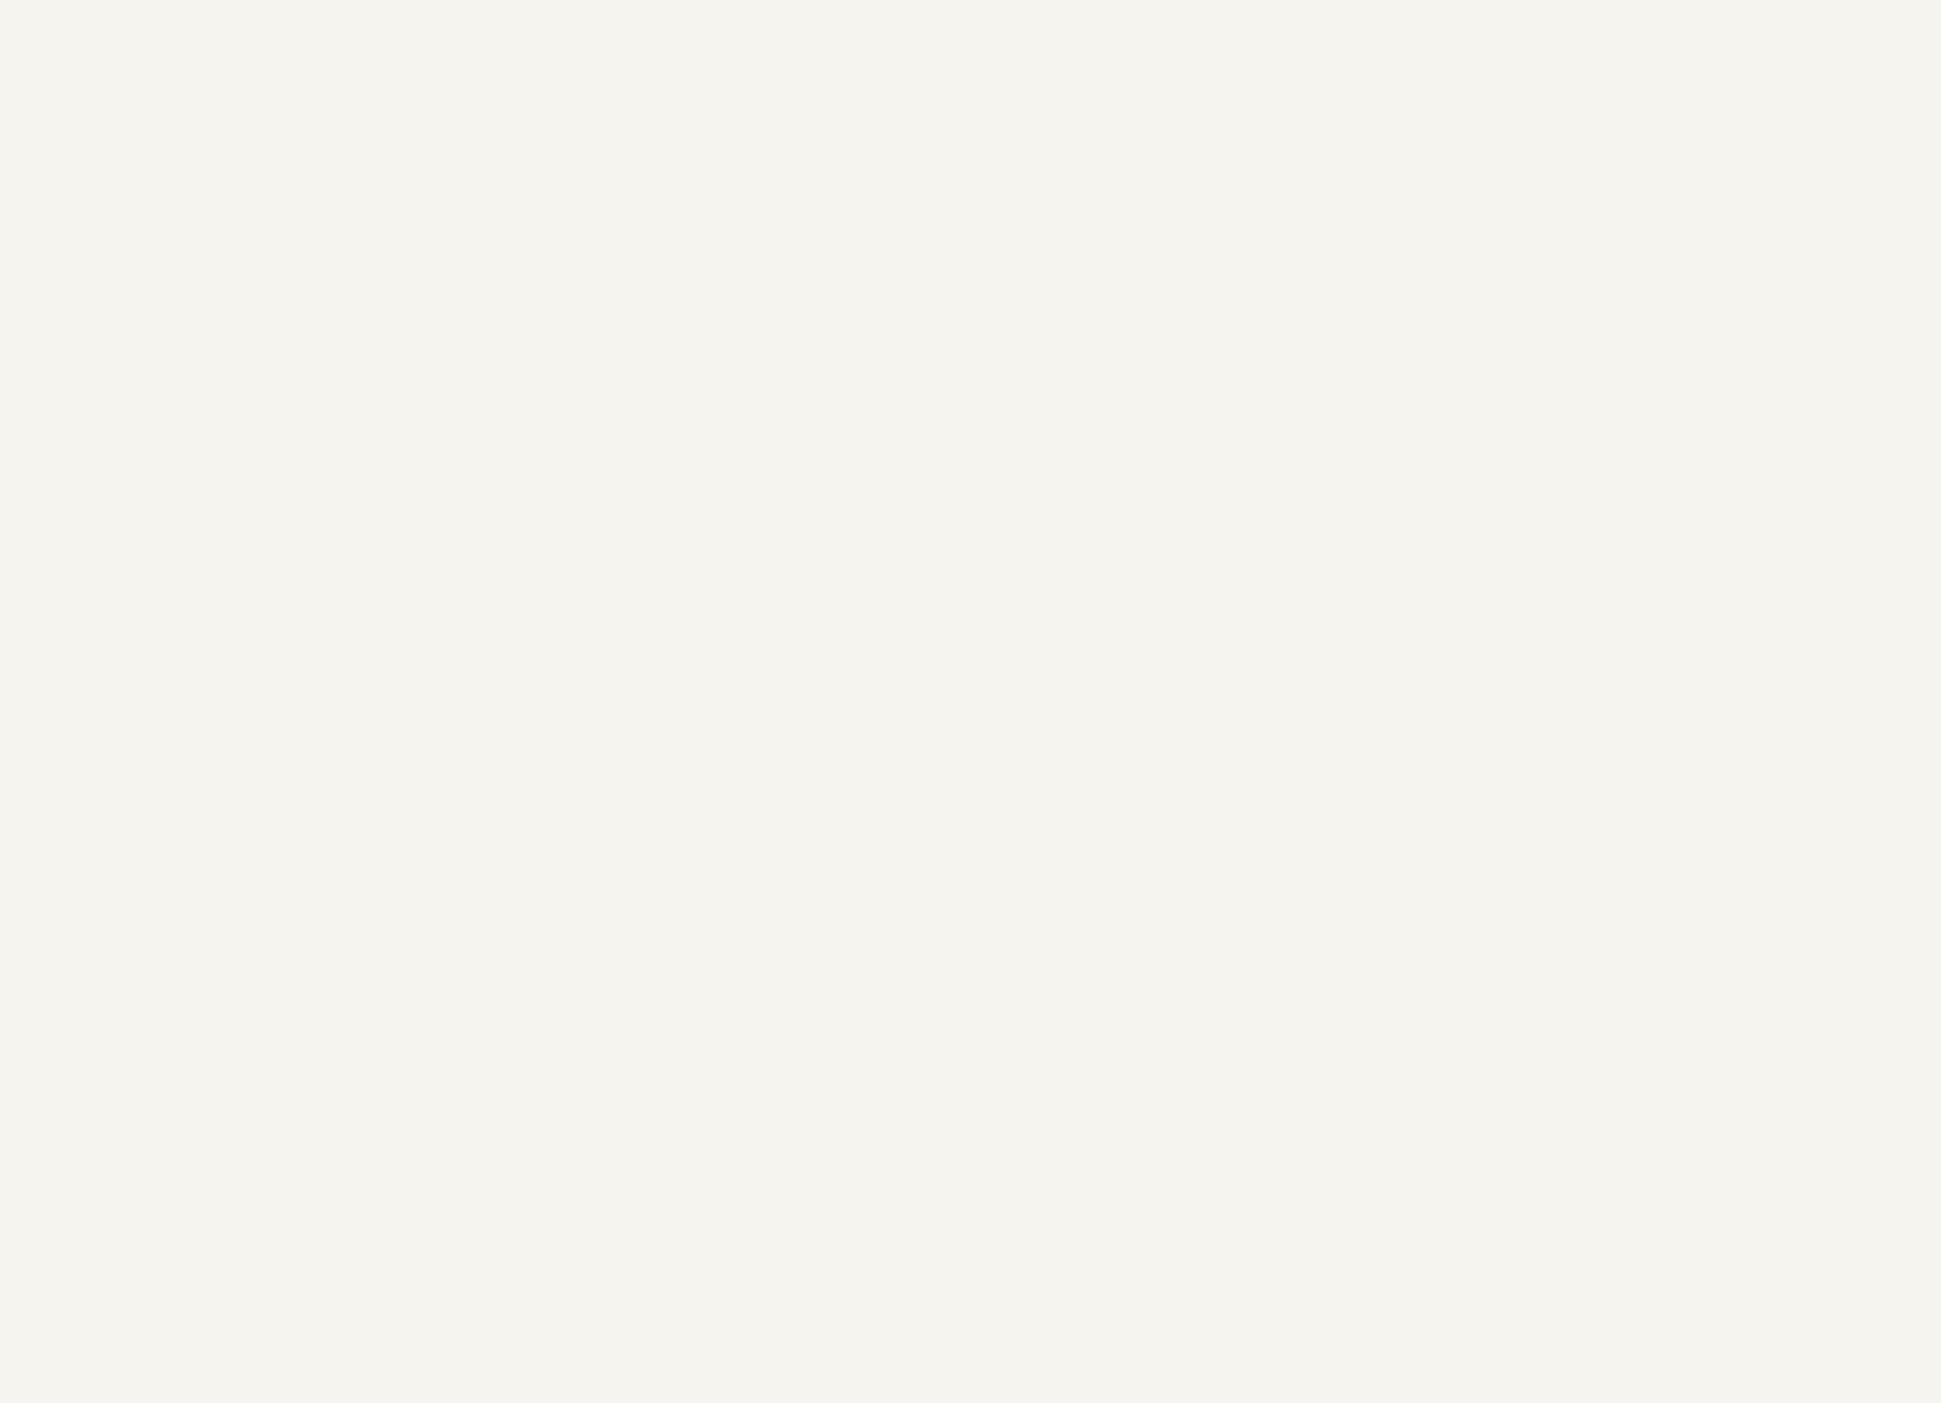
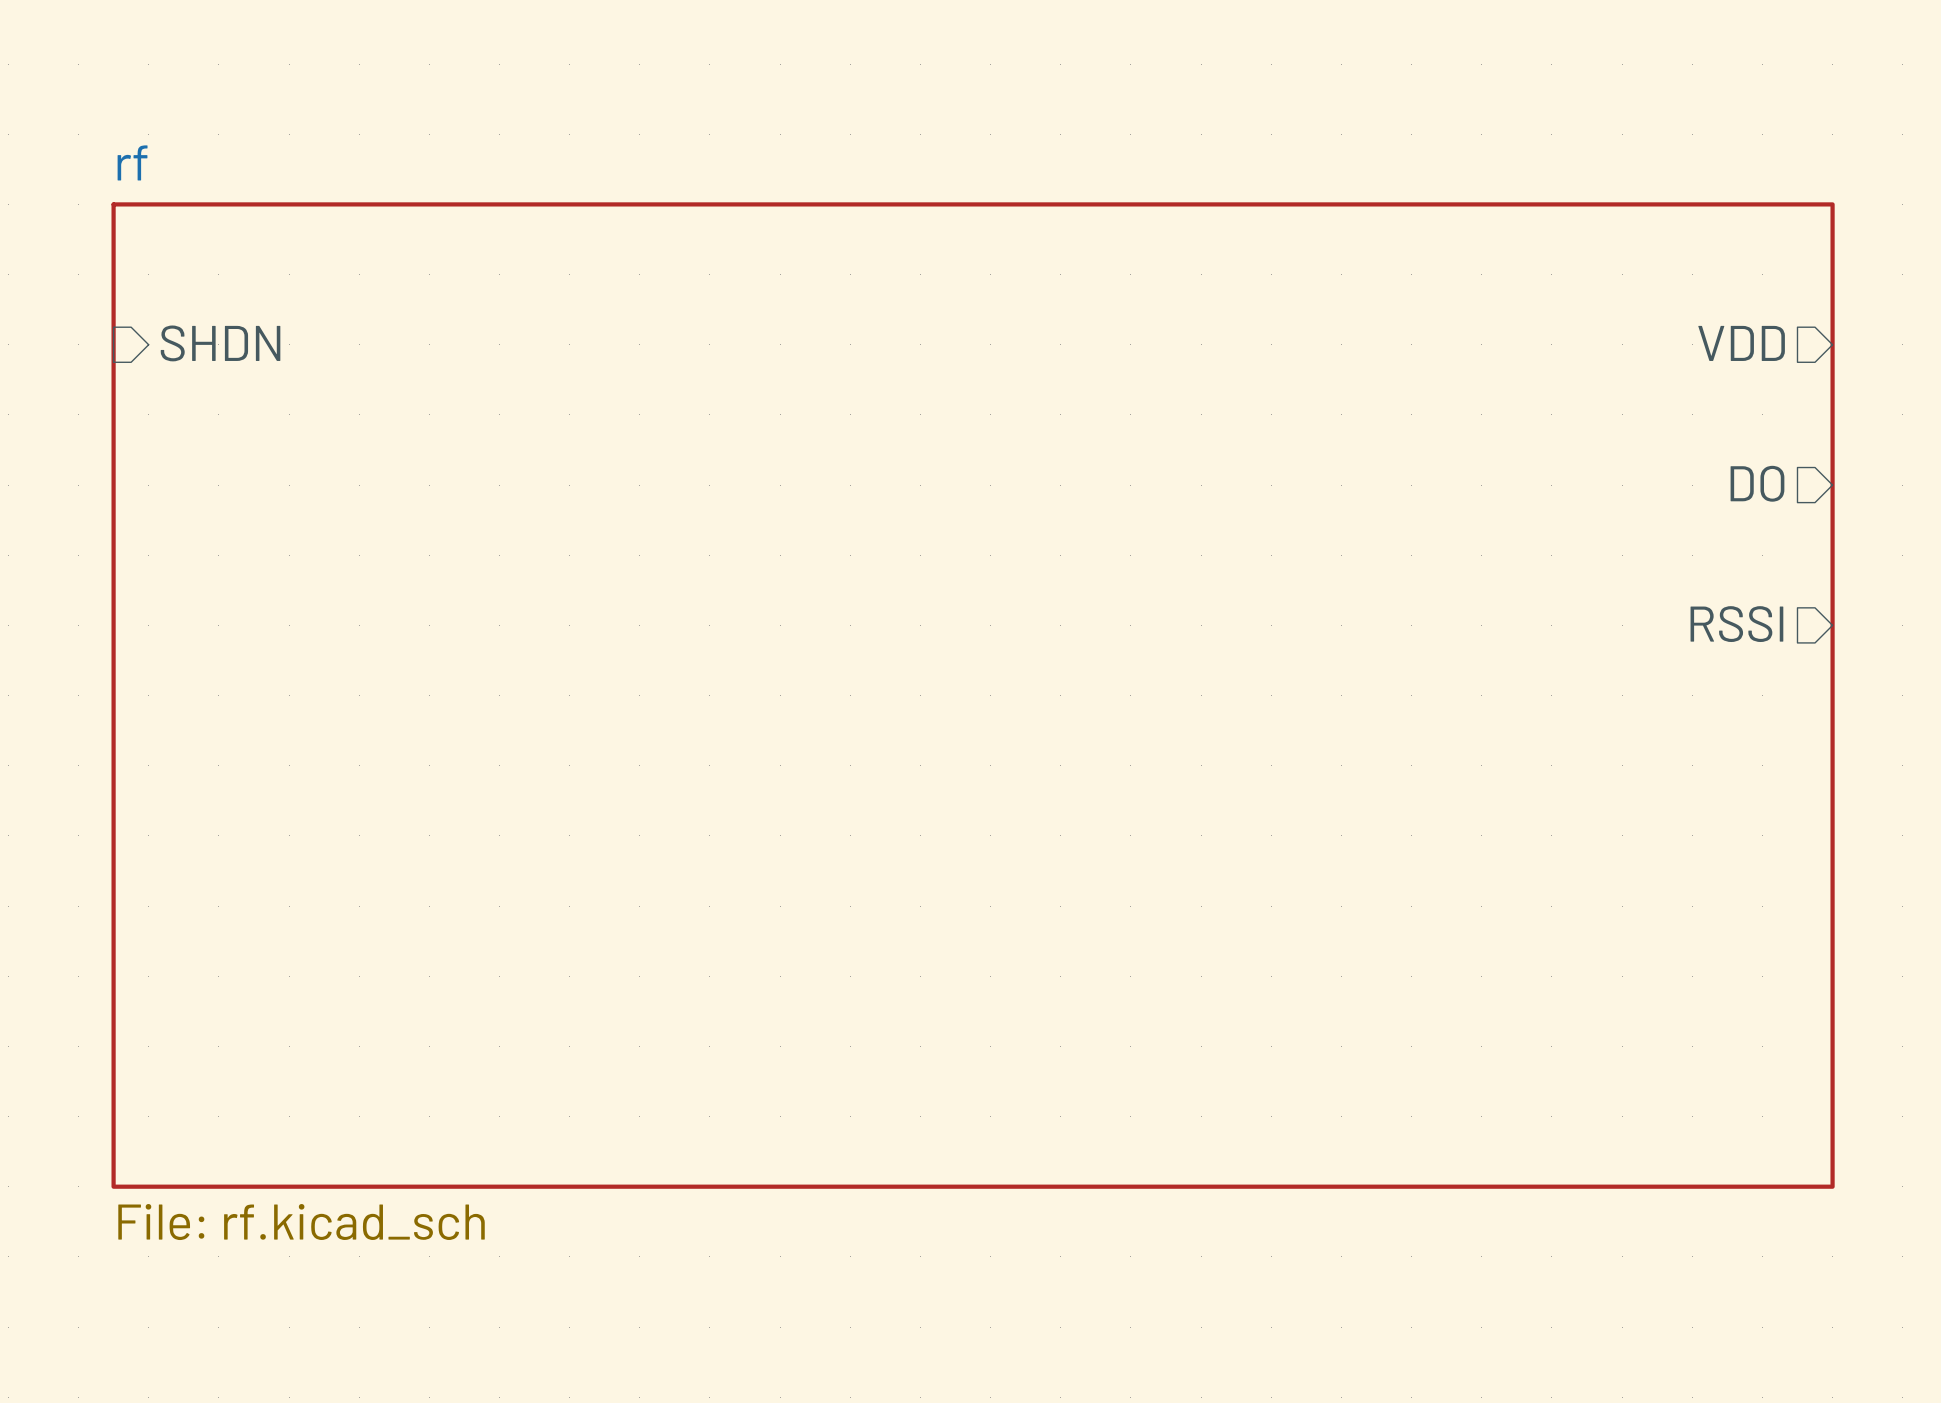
sheet pin: none -> SHDN (220, 343)
sheet pin: none -> VDD (1741, 343)
sheet pin: none -> DO (1757, 483)
sheet pin: none -> RSSI (1736, 624)
sheet rf: none -> File: rf.kicad_sch (973, 695)

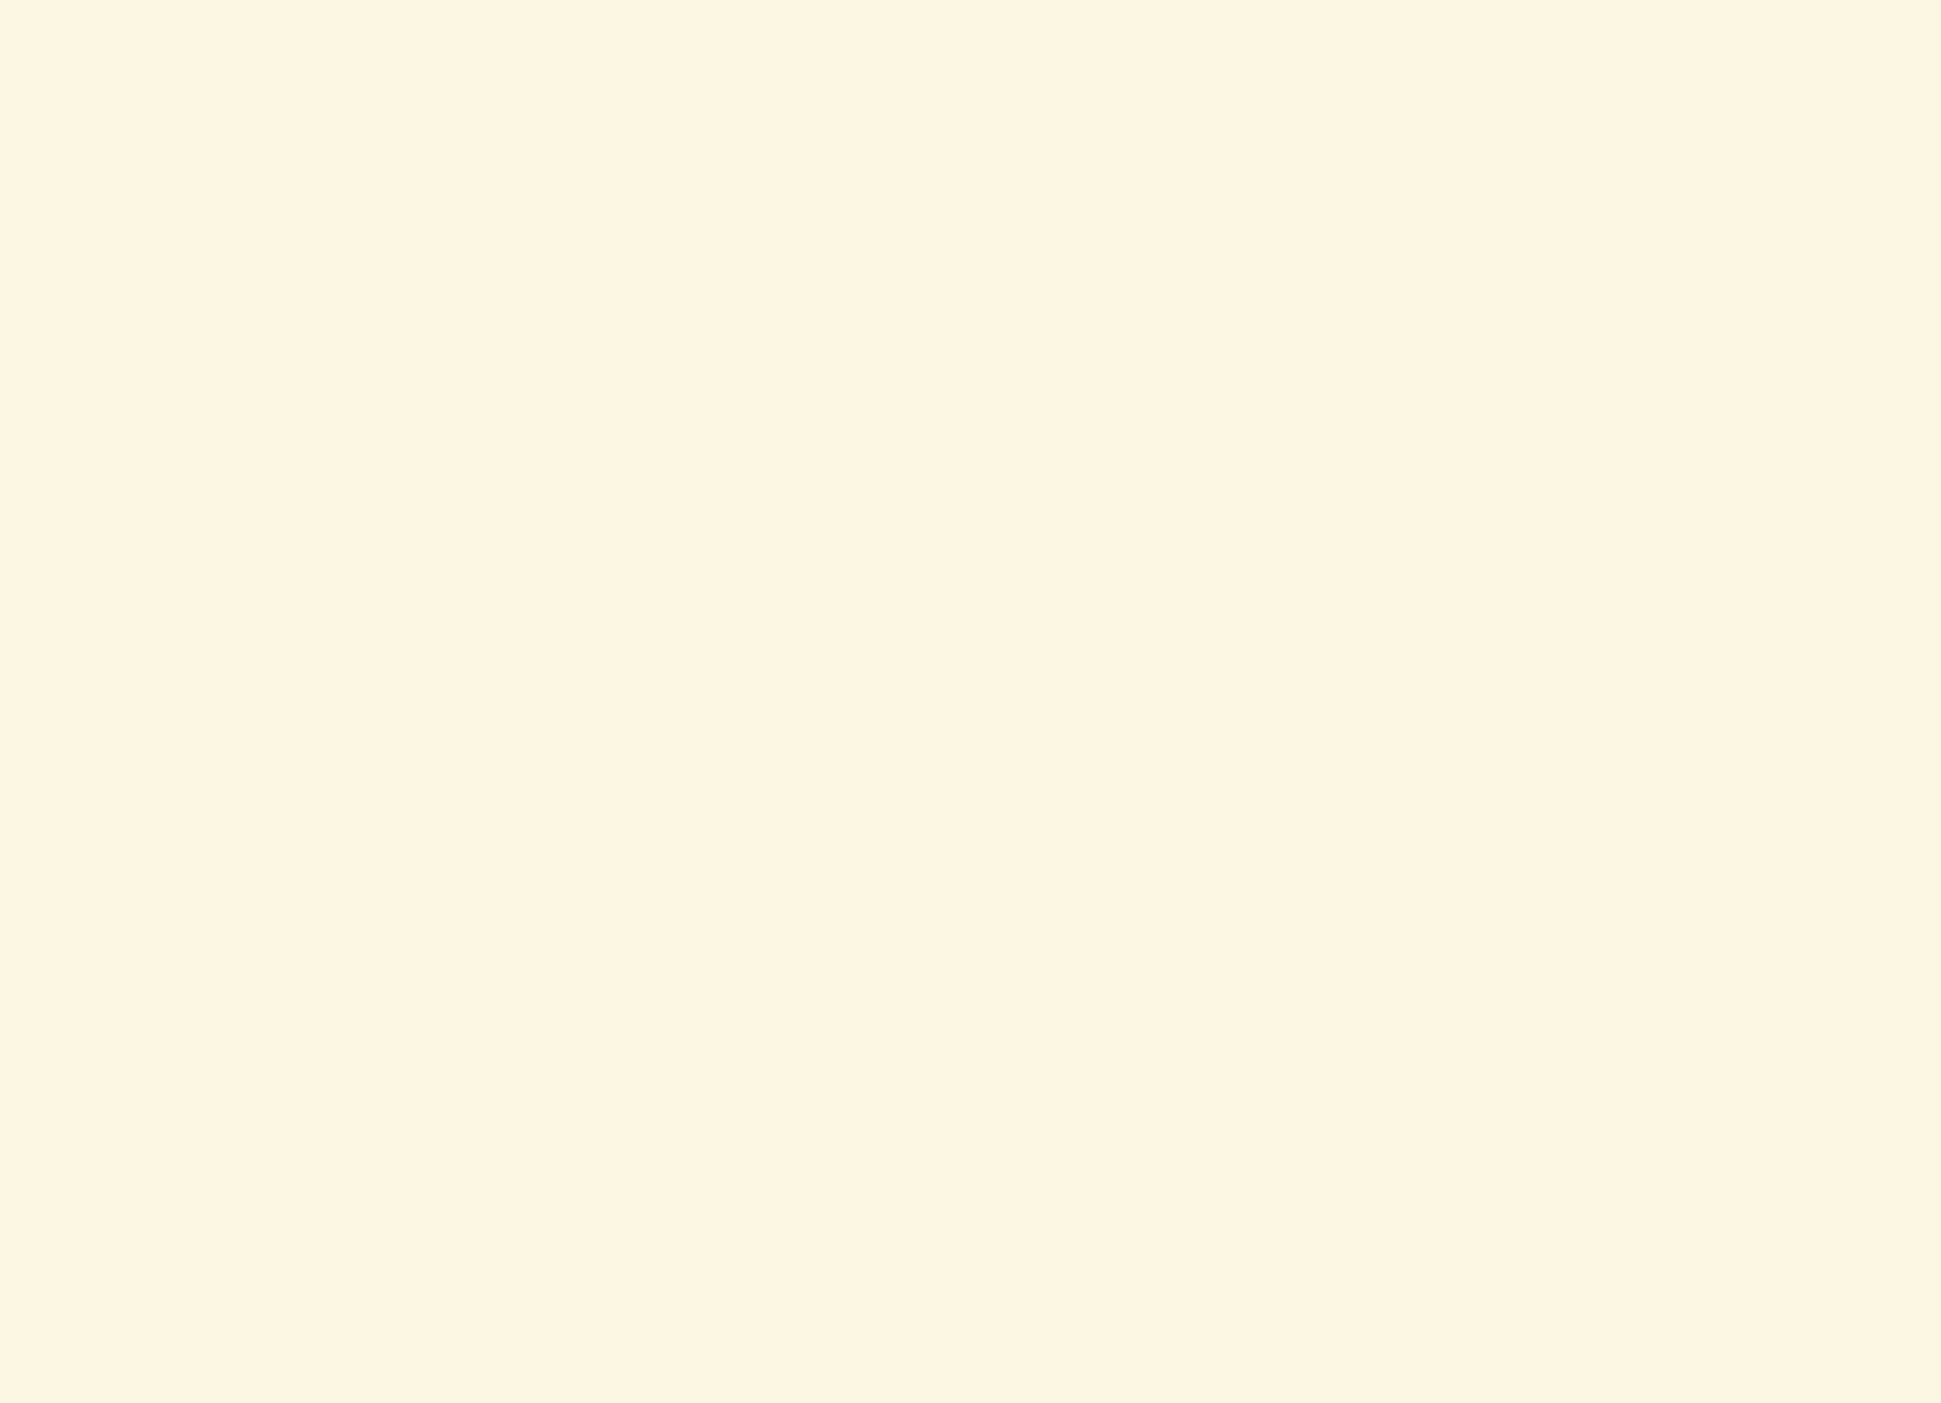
sheet pin: SHDN (220, 343) -> none
sheet pin: VDD (1741, 343) -> none
sheet pin: DO (1757, 483) -> none
sheet pin: RSSI (1736, 624) -> none
sheet rf: File: rf.kicad_sch (973, 695) -> none

